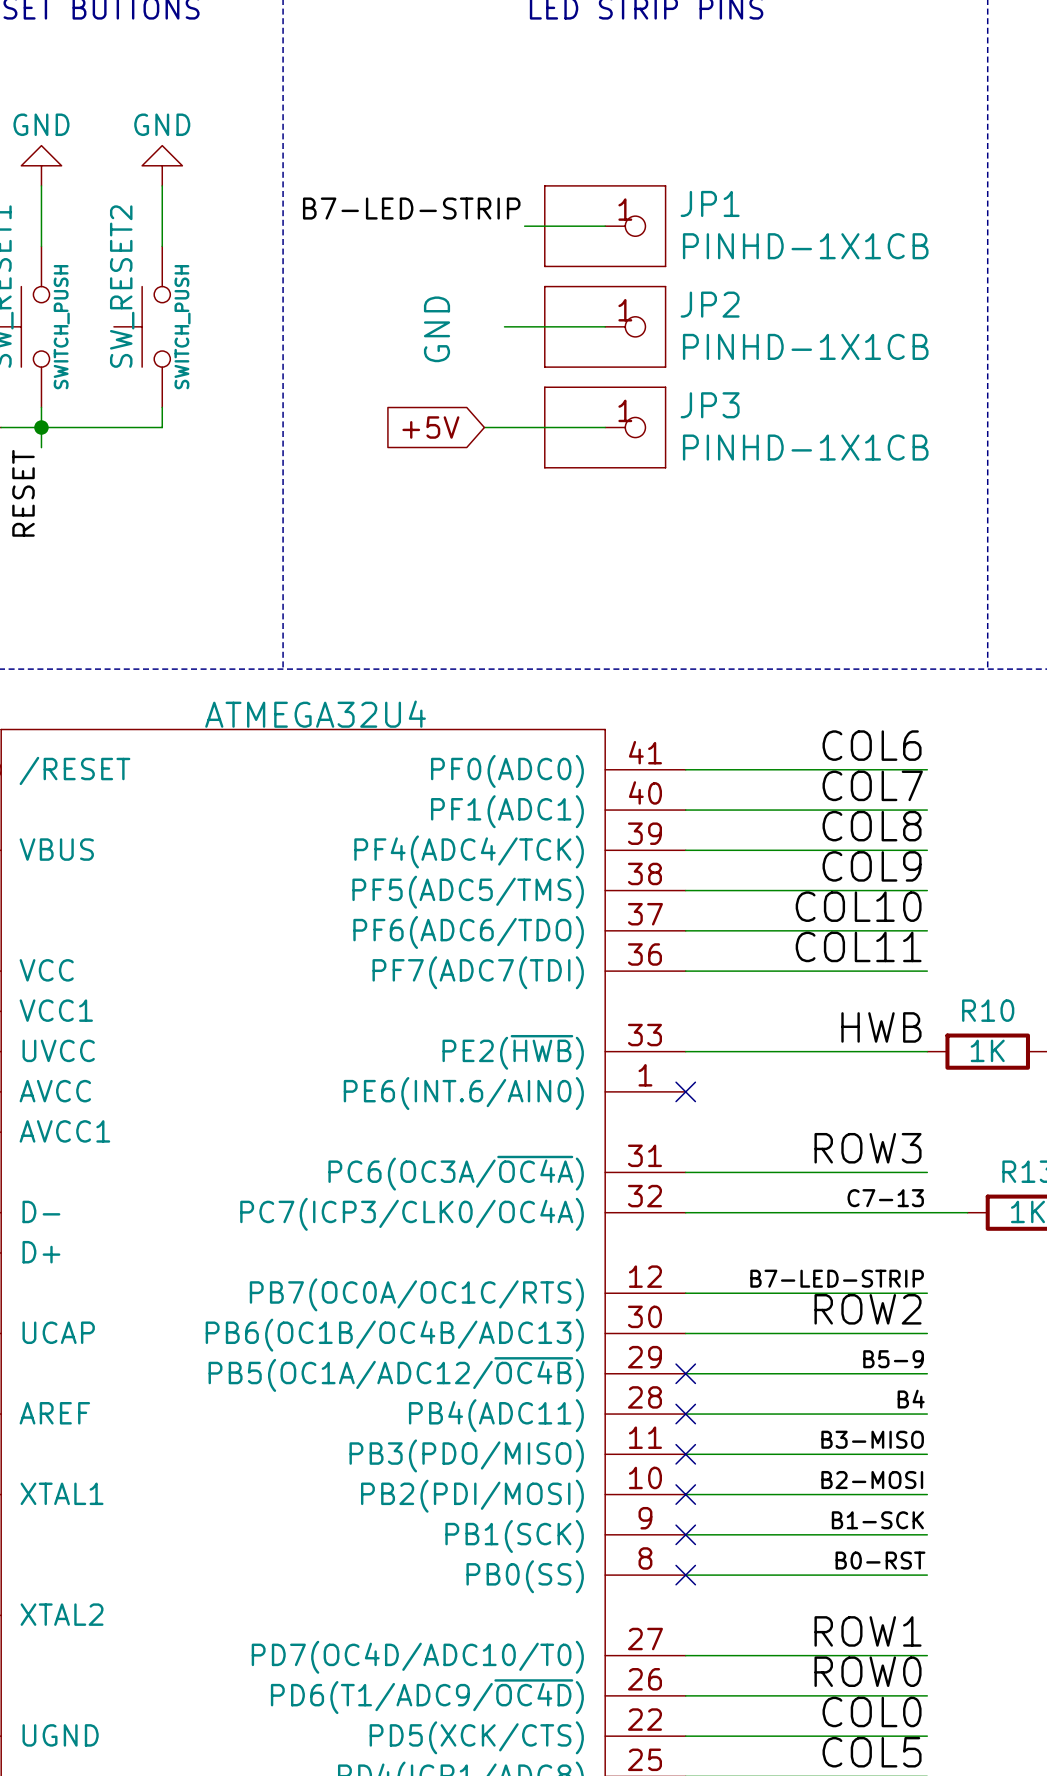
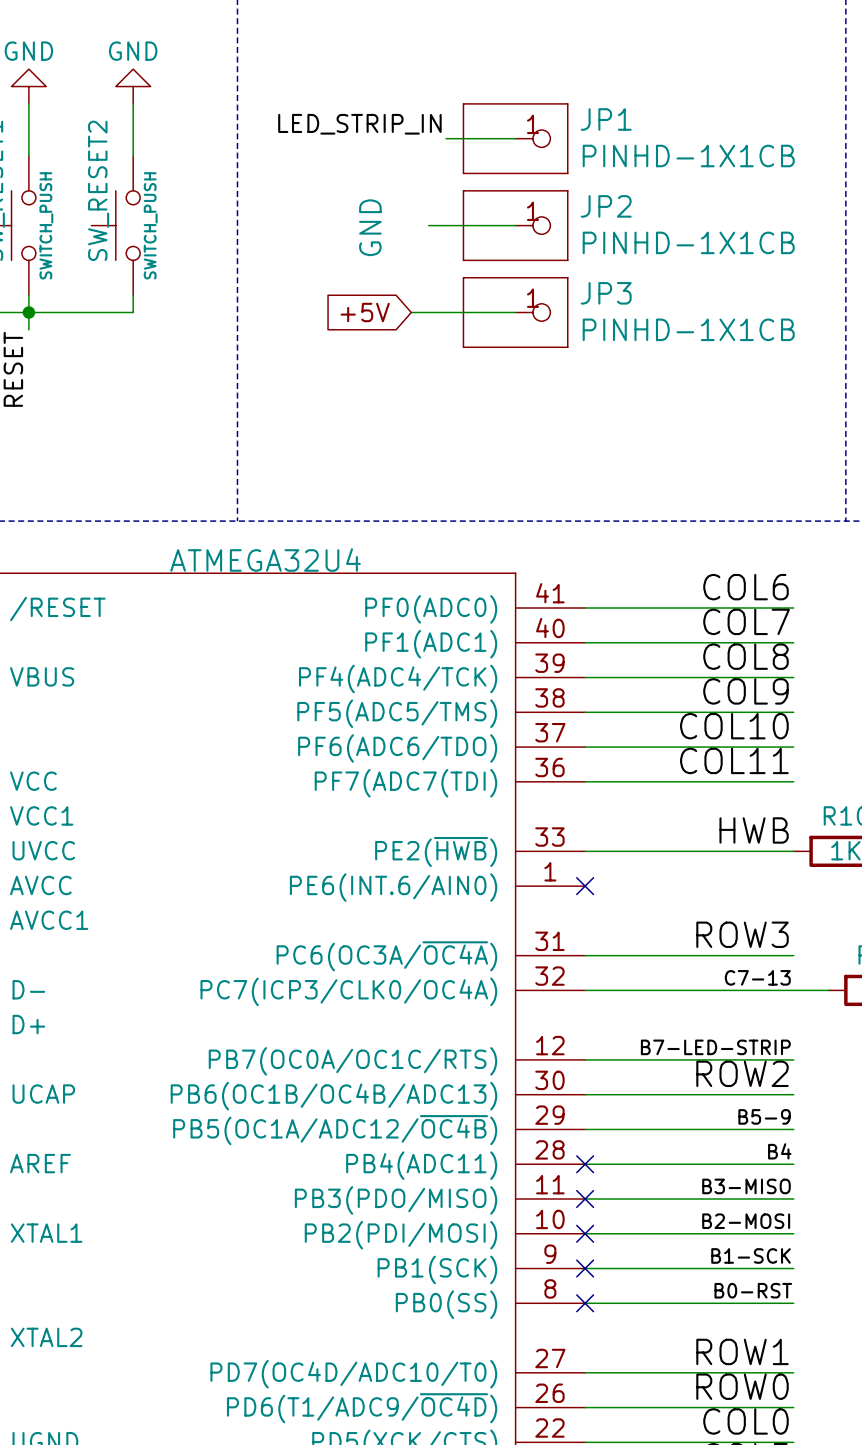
label: B7-LED-STRIP (411, 208) -> LED_STRIP_IN (359, 124)
no-connect mark: (685, 1373) -> none

